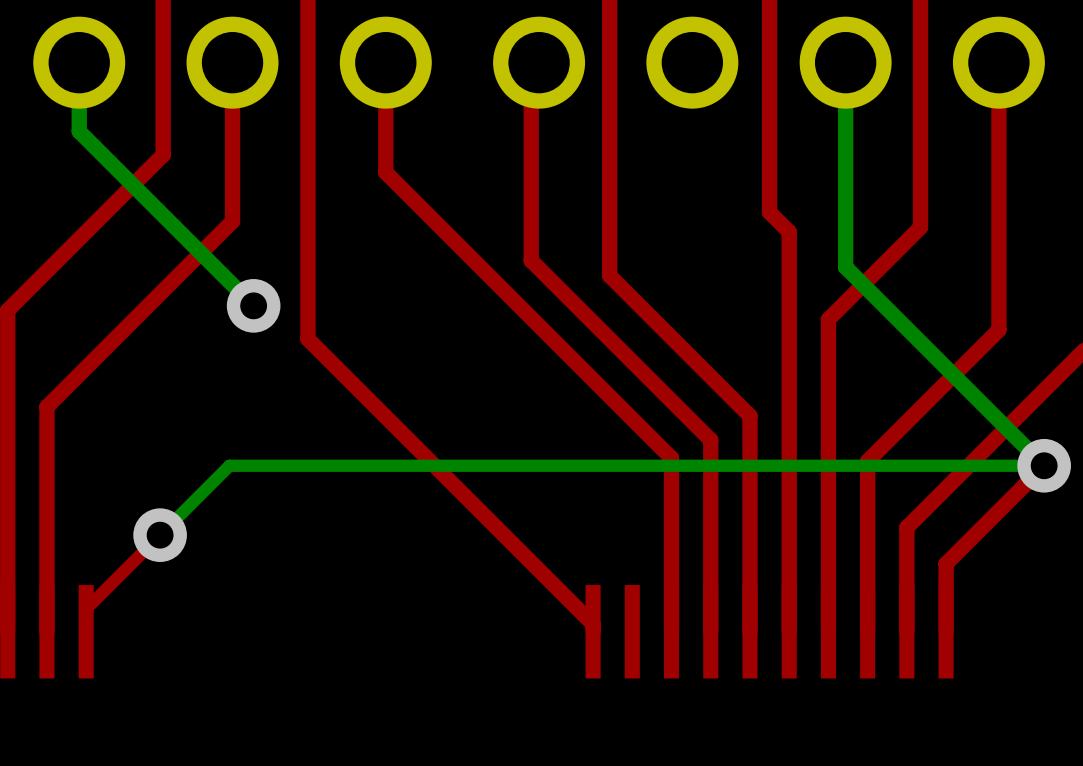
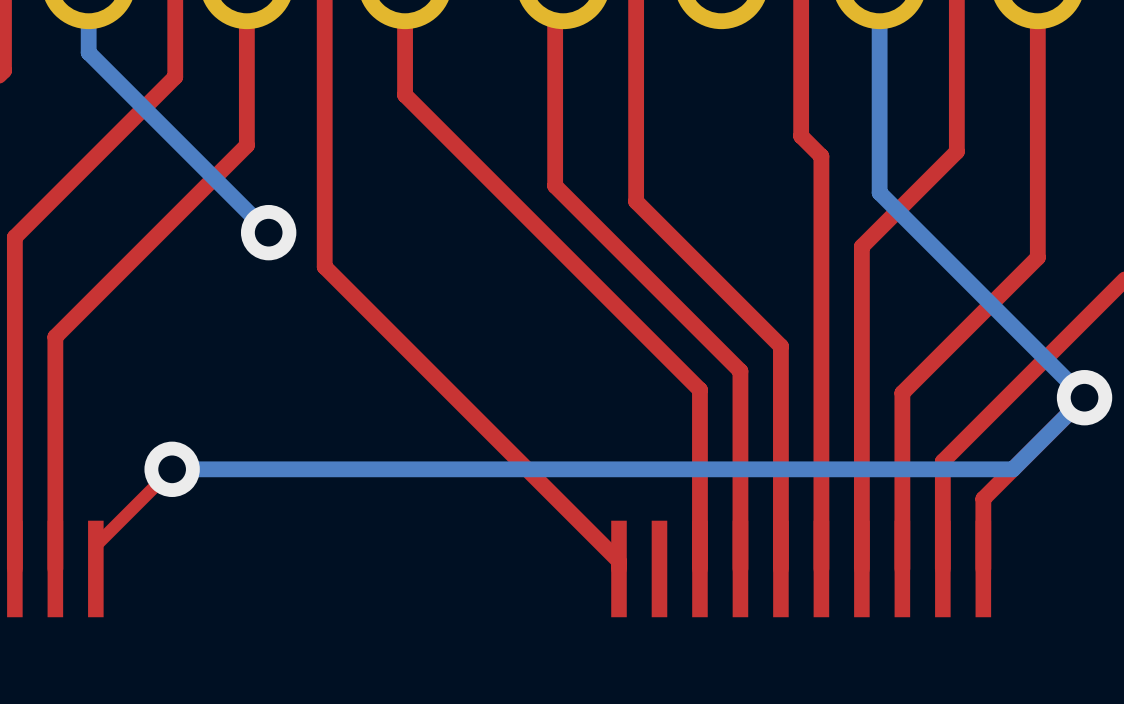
bottom track: (1044, 465) (229, 465) (160, 535) -> (1084, 397) (1012, 469) (172, 469)

